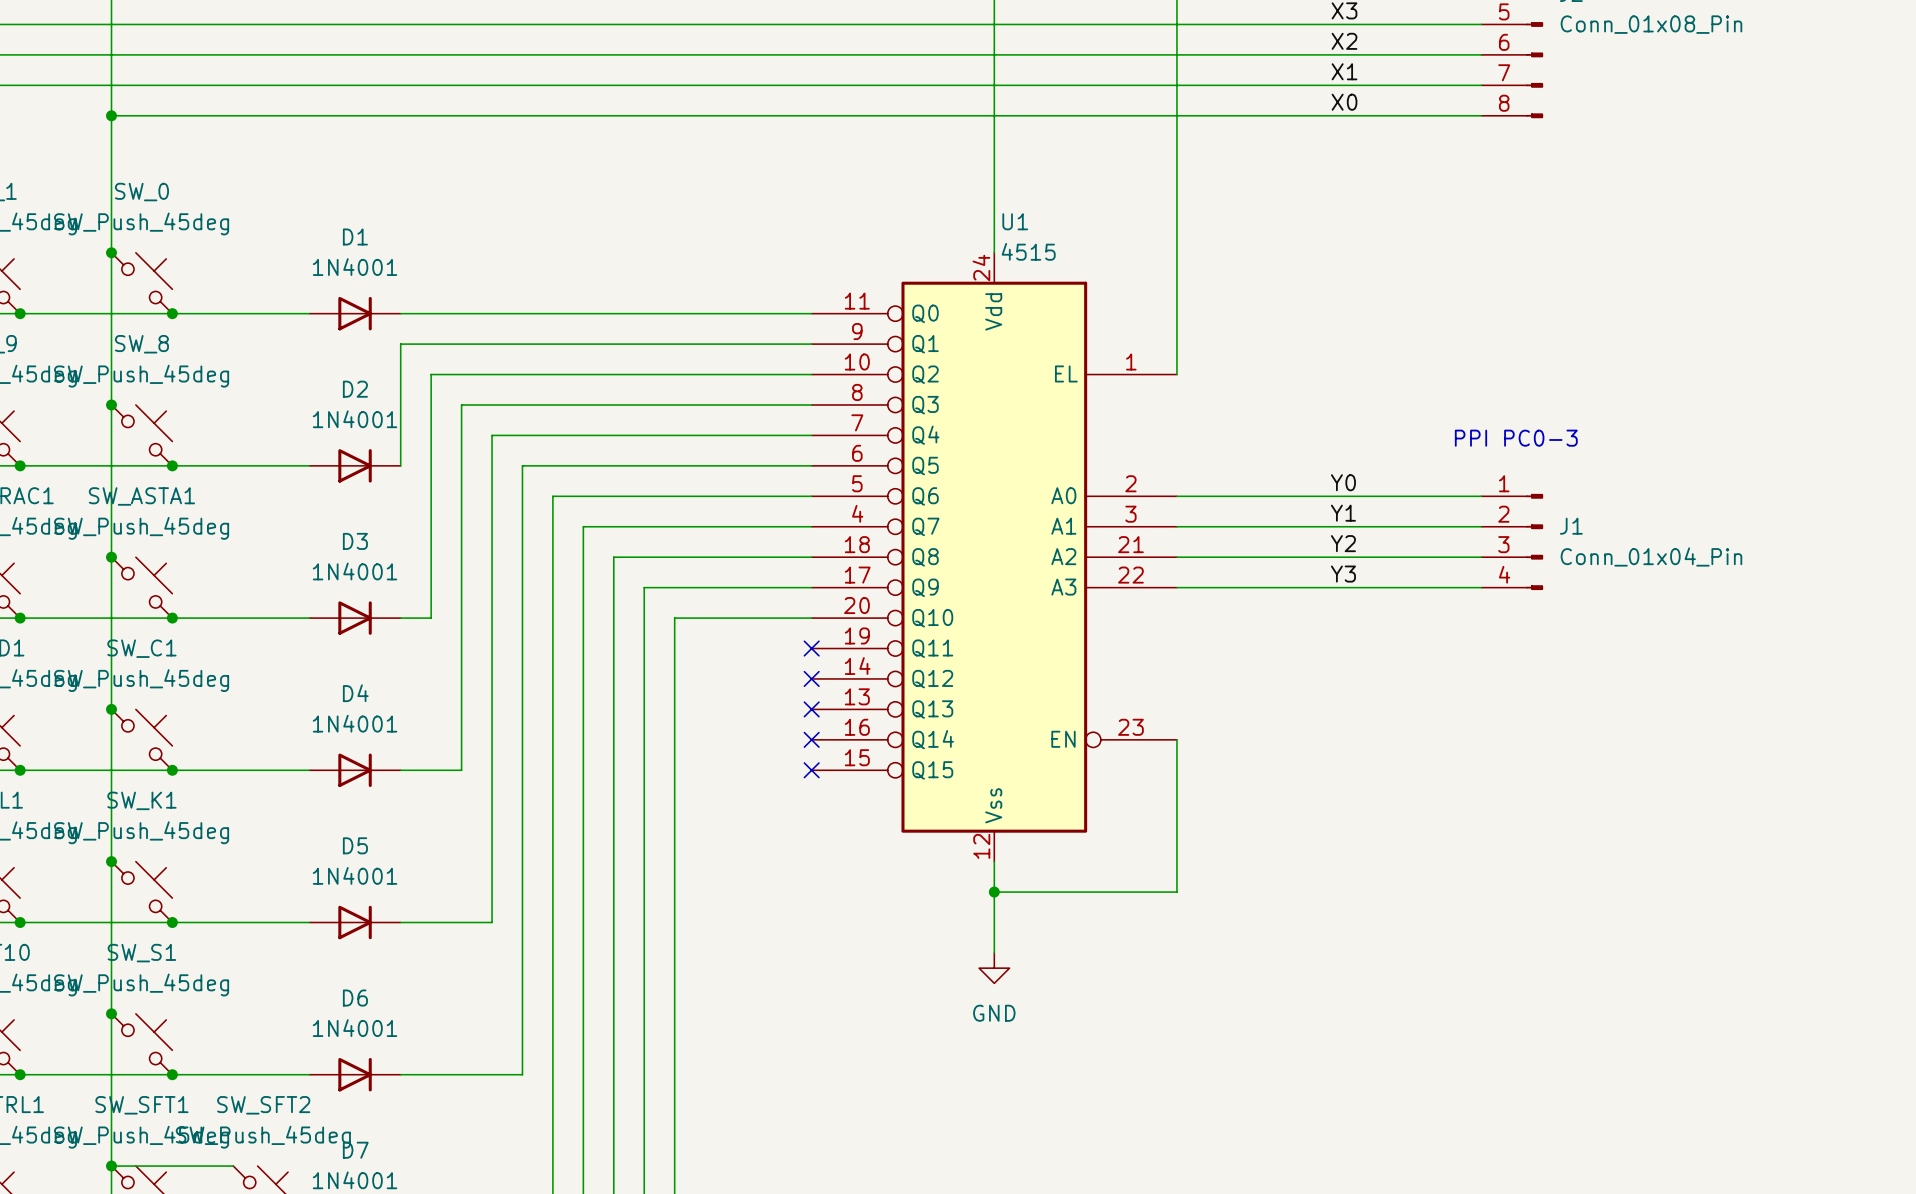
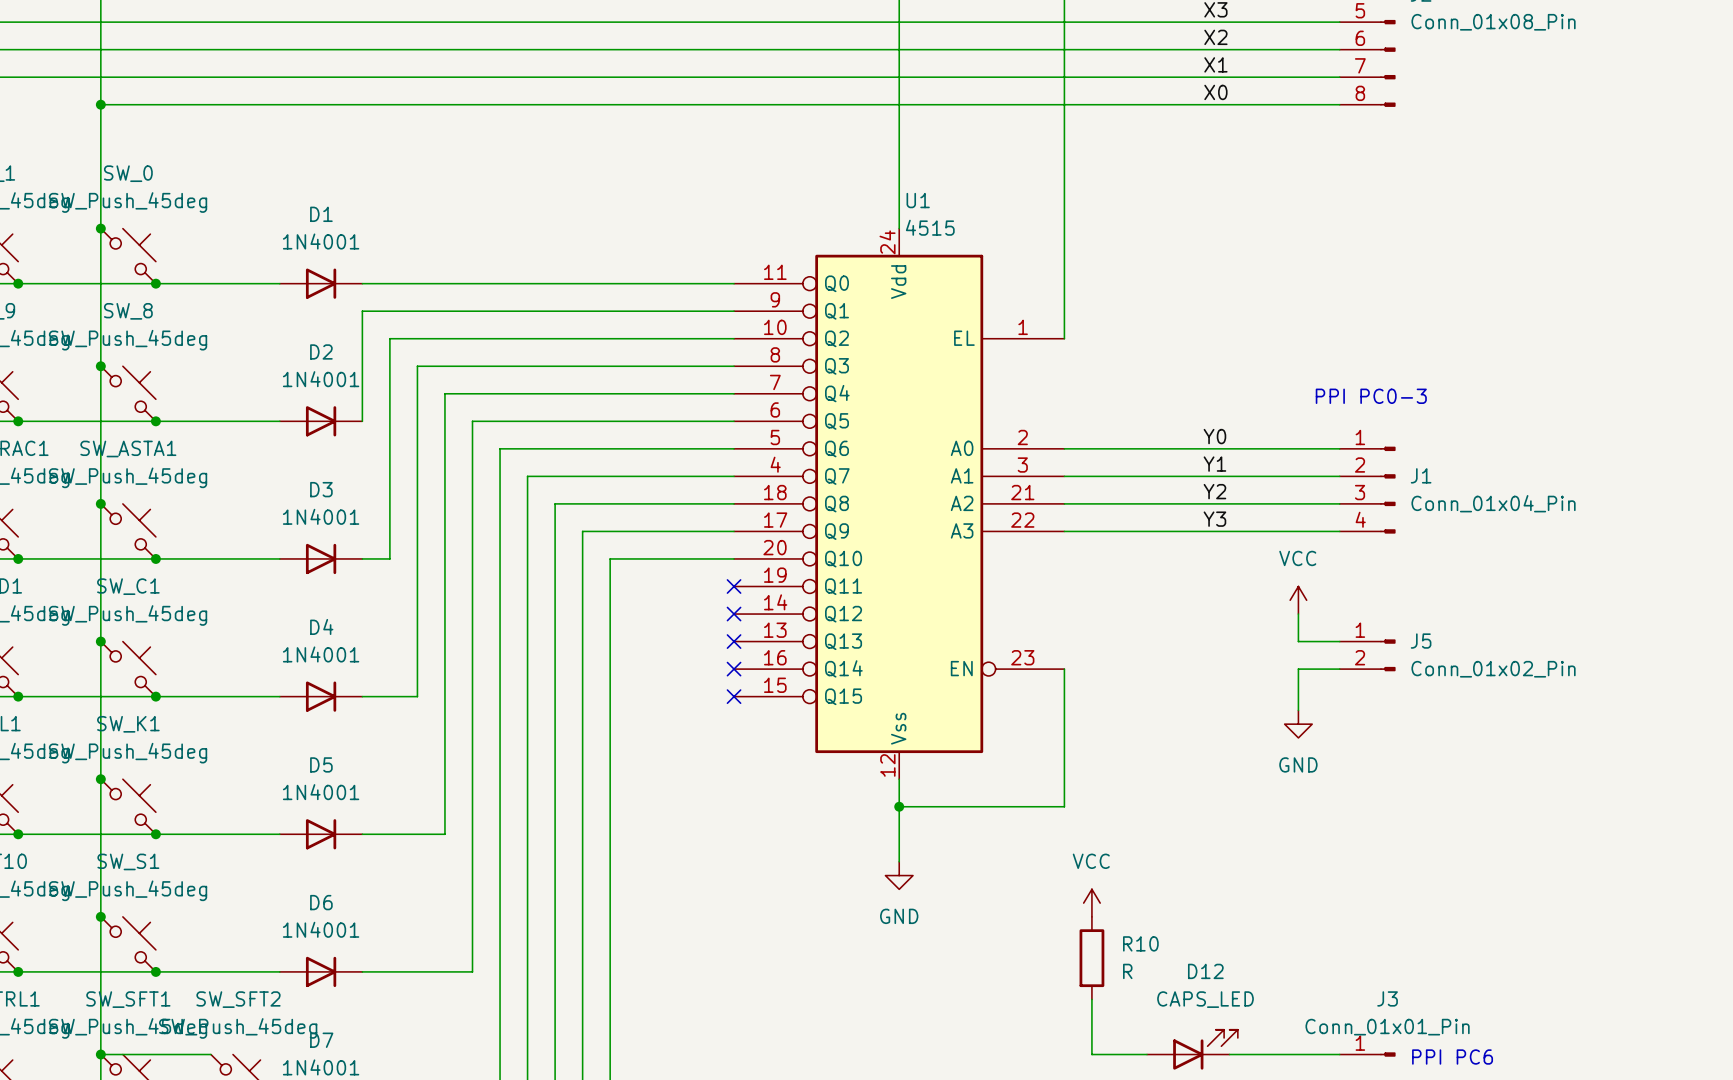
power symbol: none -> VCC (1298, 600)
wire: none -> (1298, 614) (1298, 641) (1339, 641)
J5: none -> Conn_01x02_Pin (1367, 655)
wire: none -> (1339, 669) (1298, 669) (1298, 710)
power symbol: none -> GND (1298, 724)
power symbol: none -> VCC (1091, 903)
R10: none -> R (1091, 958)
wire: none -> (1091, 999) (1091, 1054) (1147, 1054)
D12: none -> CAPS_LED (1192, 1049)
wire: none -> (1229, 1054) (1339, 1054)
J3: none -> Conn_01x01_Pin (1367, 1054)
text: none -> PPI PC6 (1452, 1057)

